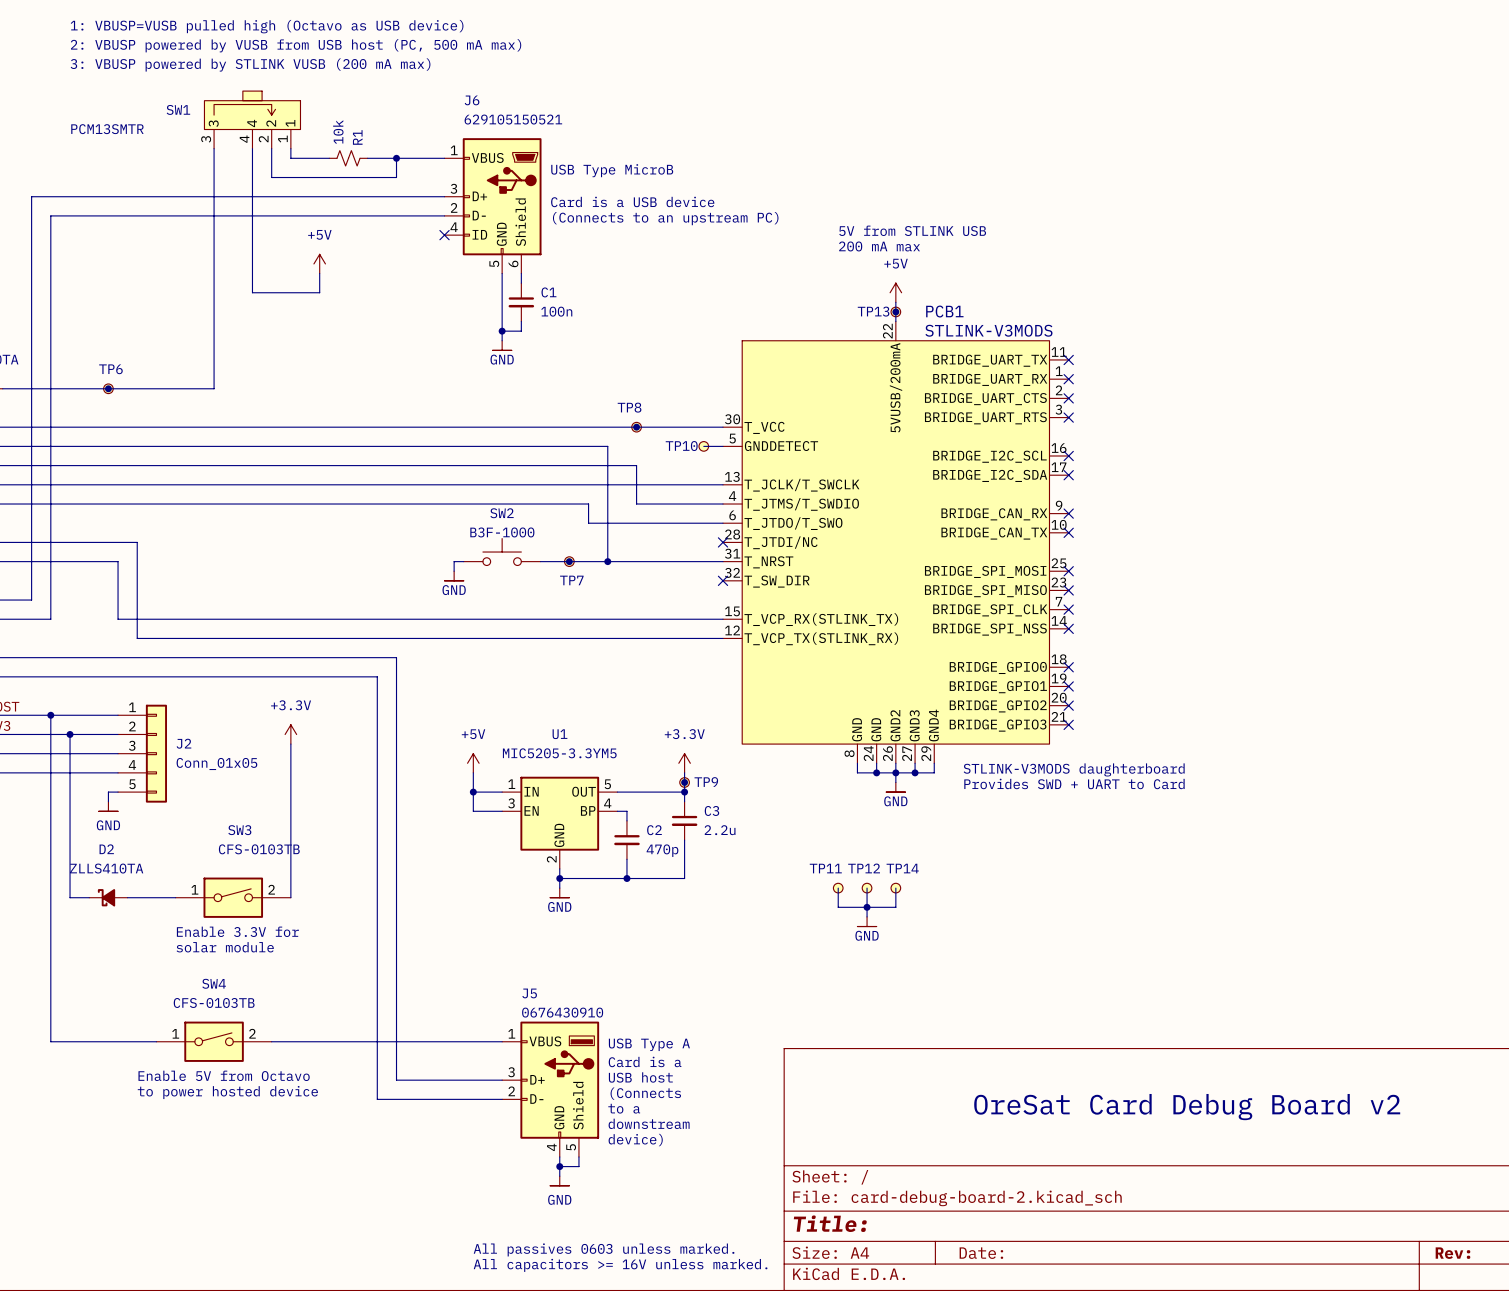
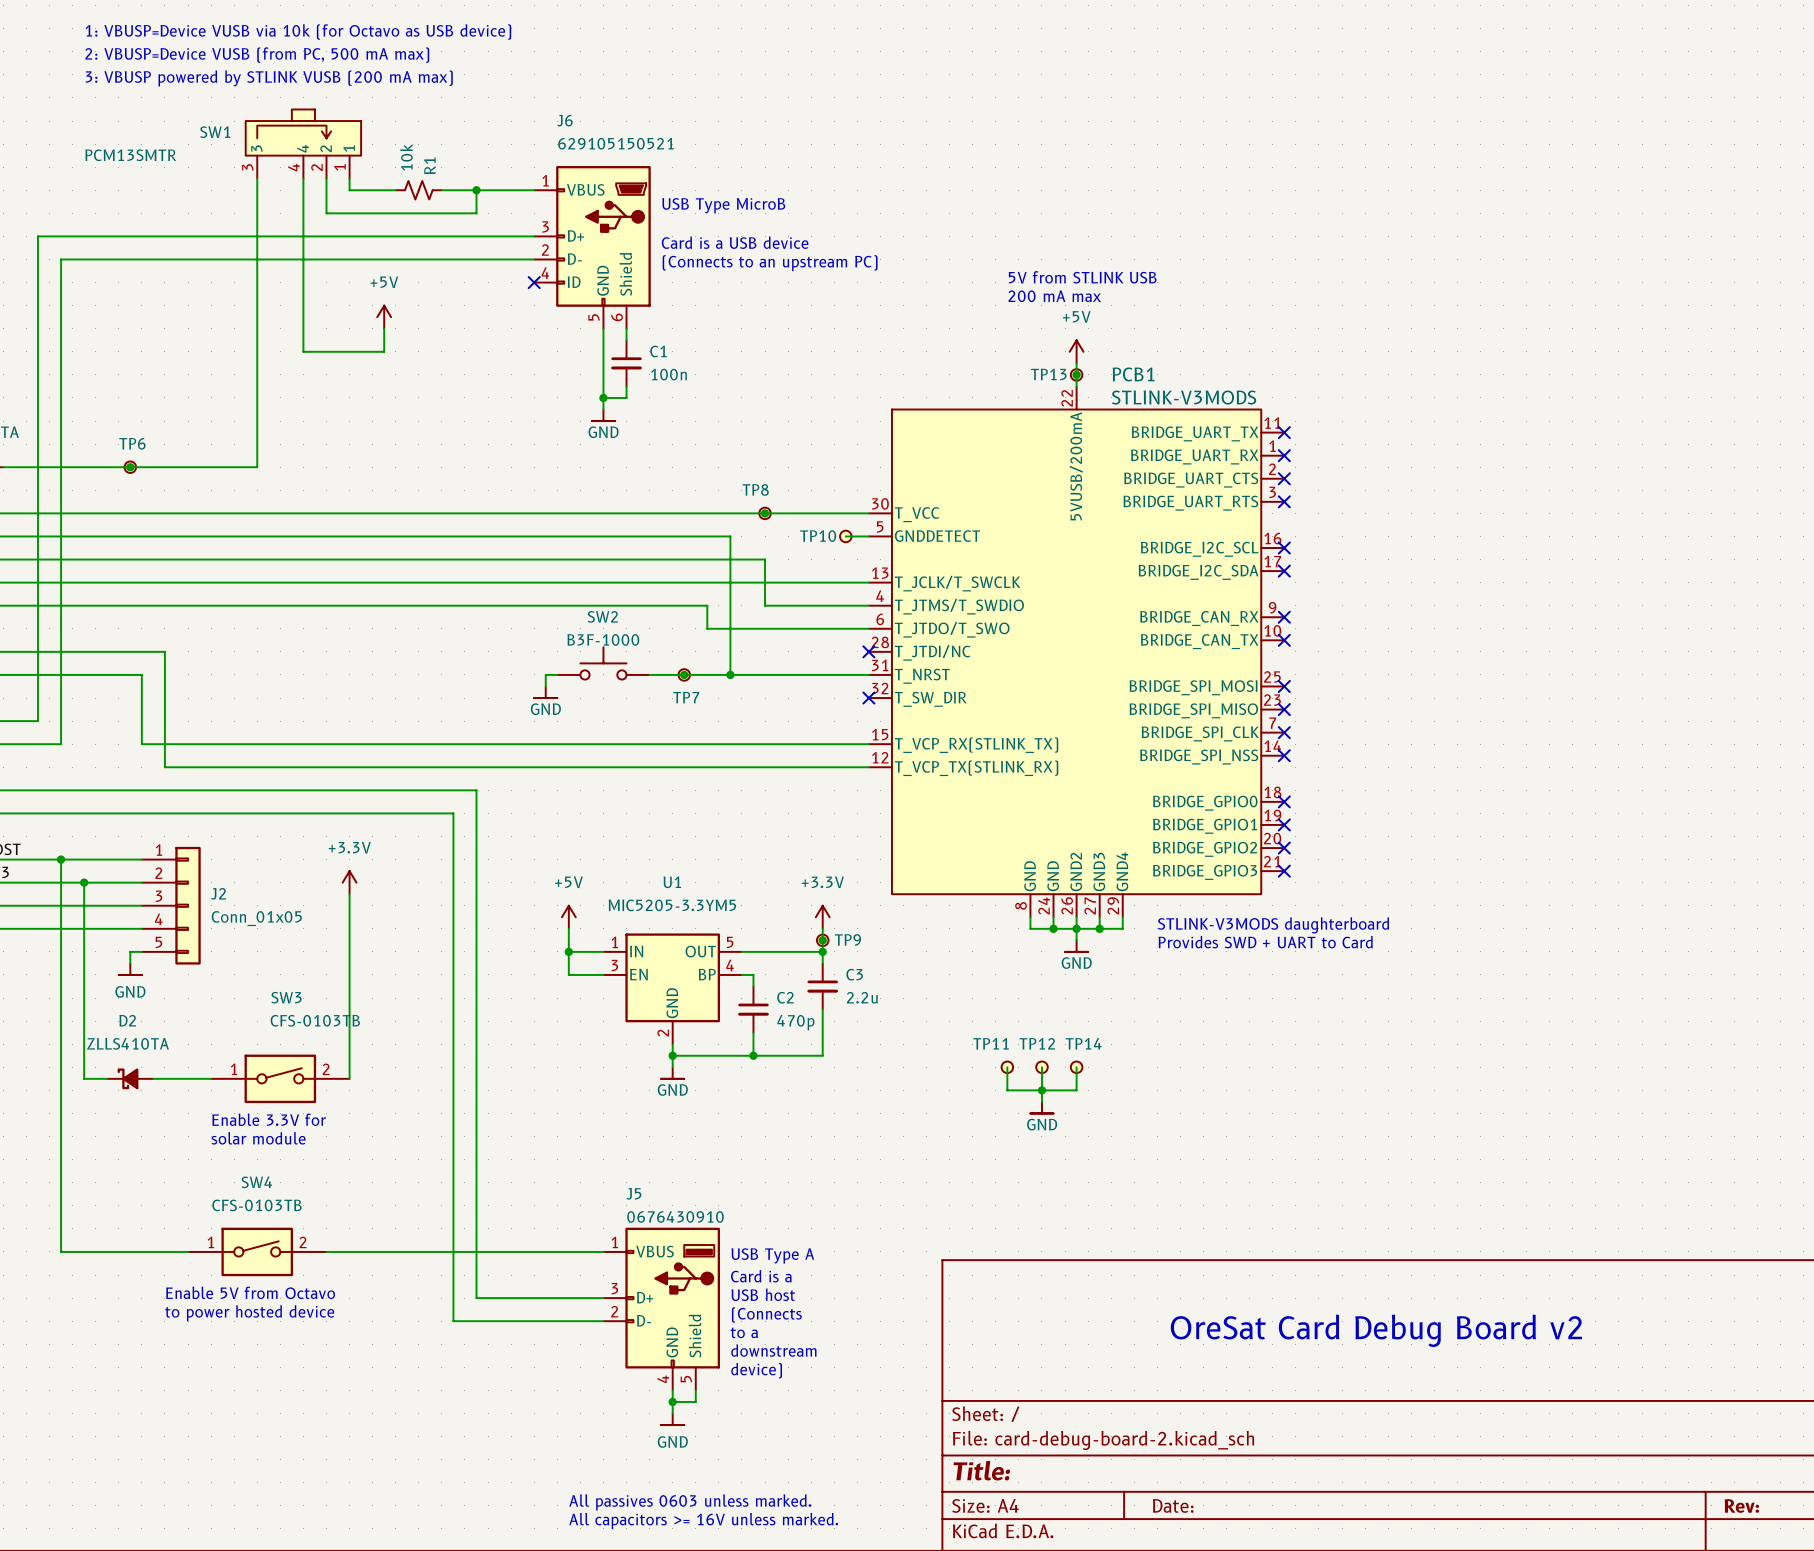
text: 1: VBUSP=VUSB pulled high (Octavo as USB device) (267, 26) -> 1: VBUSP=Device VUSB via 10k (for Octavo as USB device) (298, 31)
text: 2: VBUSP powered by VUSB from USB host (PC, 500 mA max) (296, 45) -> 2: VBUSP=Device VUSB (from PC, 500 mA max) (257, 55)

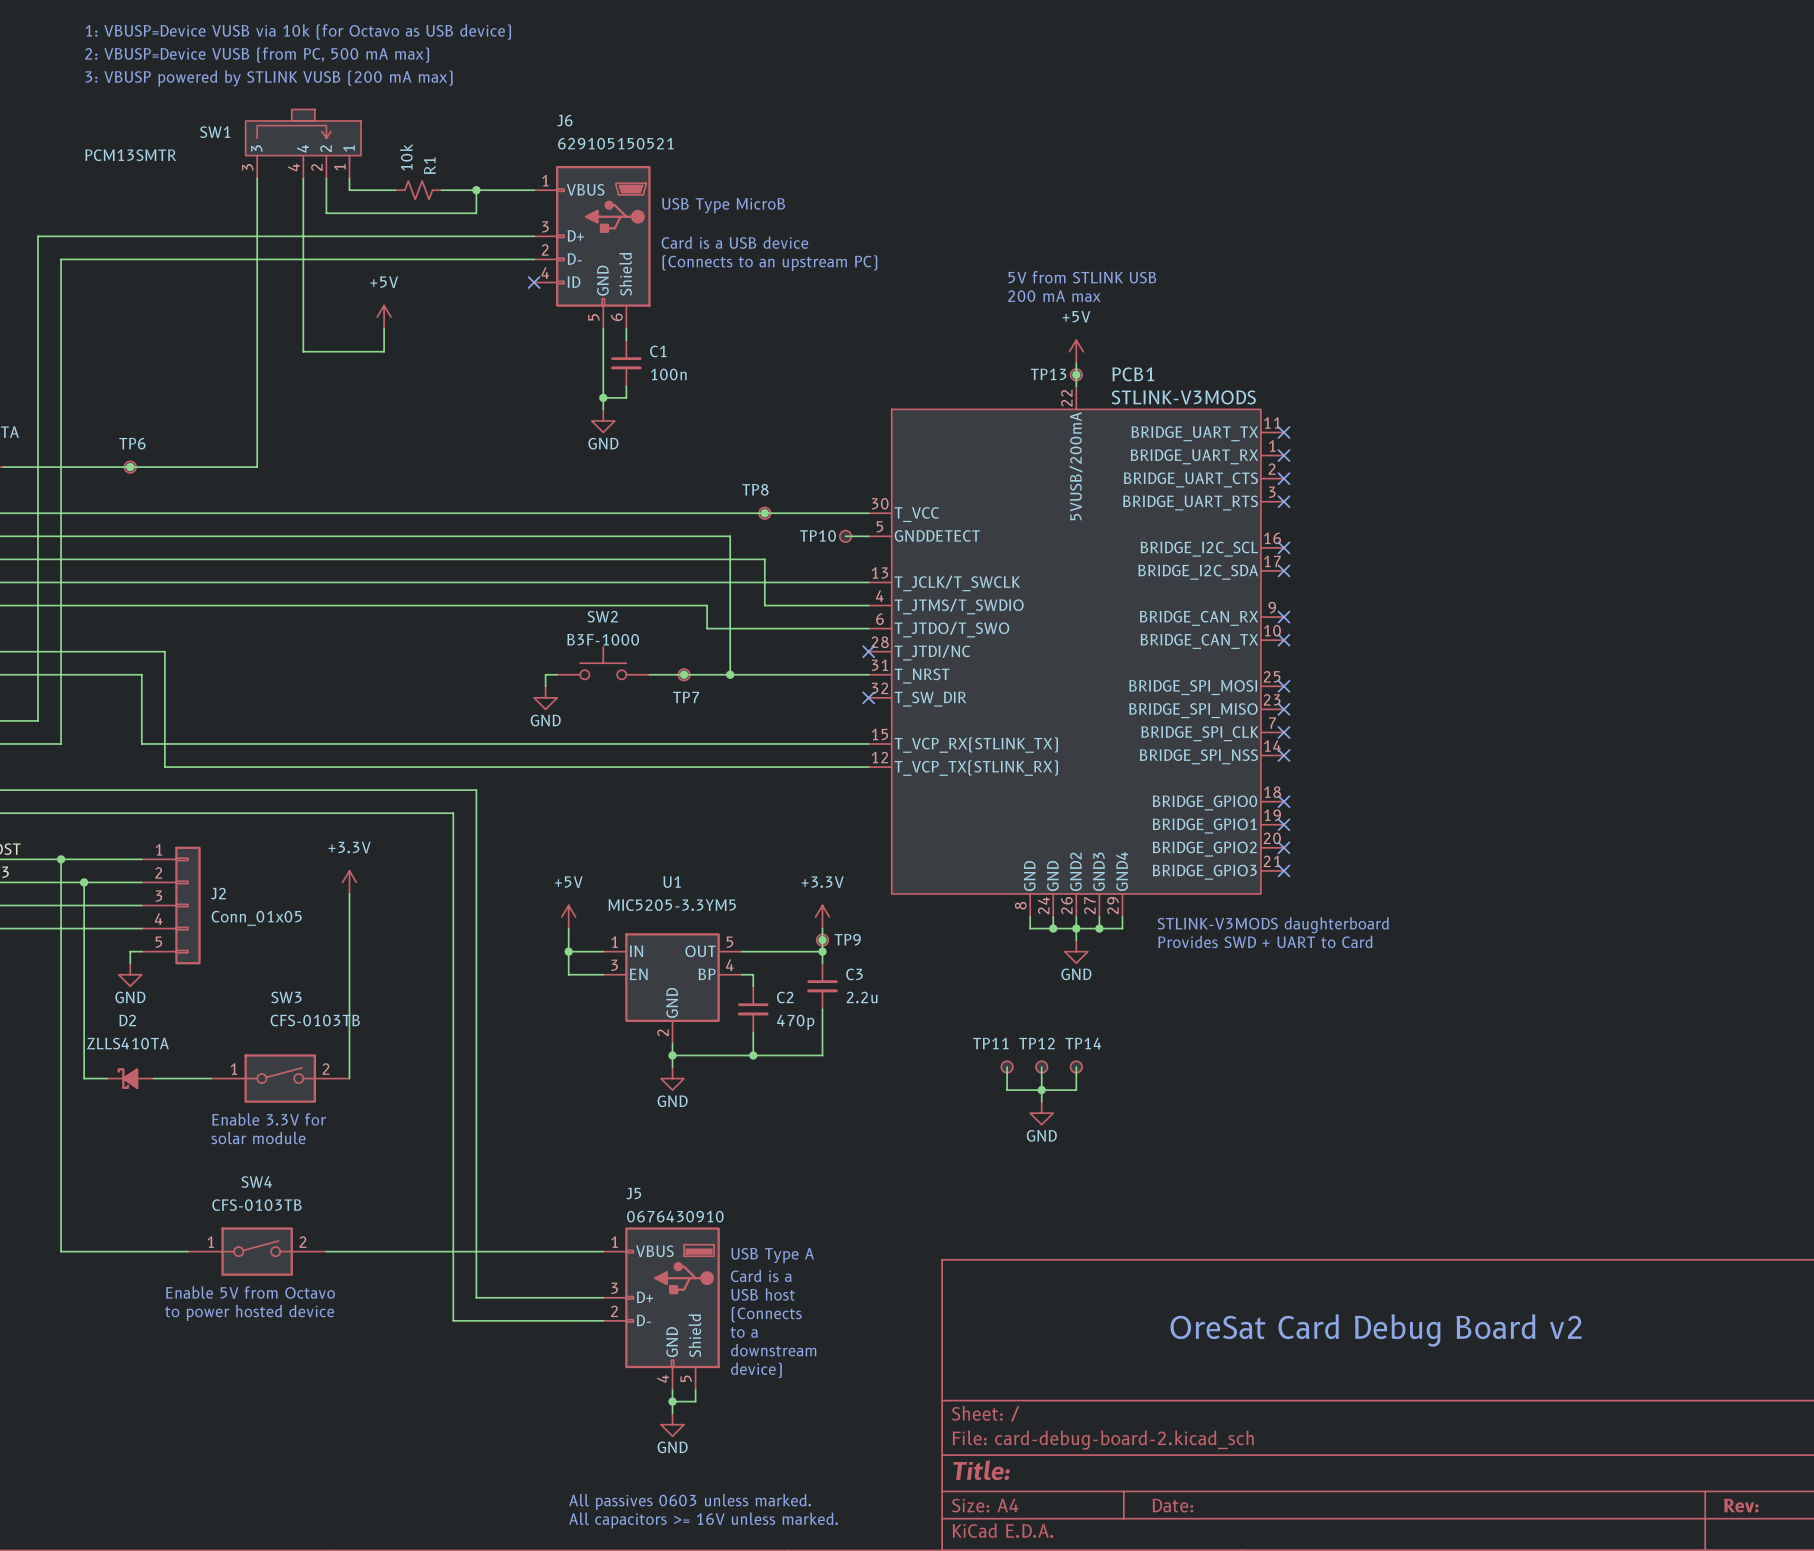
power symbol shape: [591, 409, 615, 422] -> [591, 409, 615, 433]
power symbol shape: [534, 686, 558, 699] -> [534, 686, 558, 710]
power symbol shape: [1065, 940, 1089, 952] -> [1064, 940, 1088, 964]
power symbol shape: [118, 963, 142, 975] -> [118, 963, 142, 987]
power symbol shape: [661, 1067, 685, 1079] -> [660, 1067, 685, 1091]
power symbol shape: [1030, 1101, 1054, 1114] -> [1030, 1101, 1054, 1125]
power symbol shape: [661, 1413, 685, 1426] -> [660, 1413, 685, 1437]

